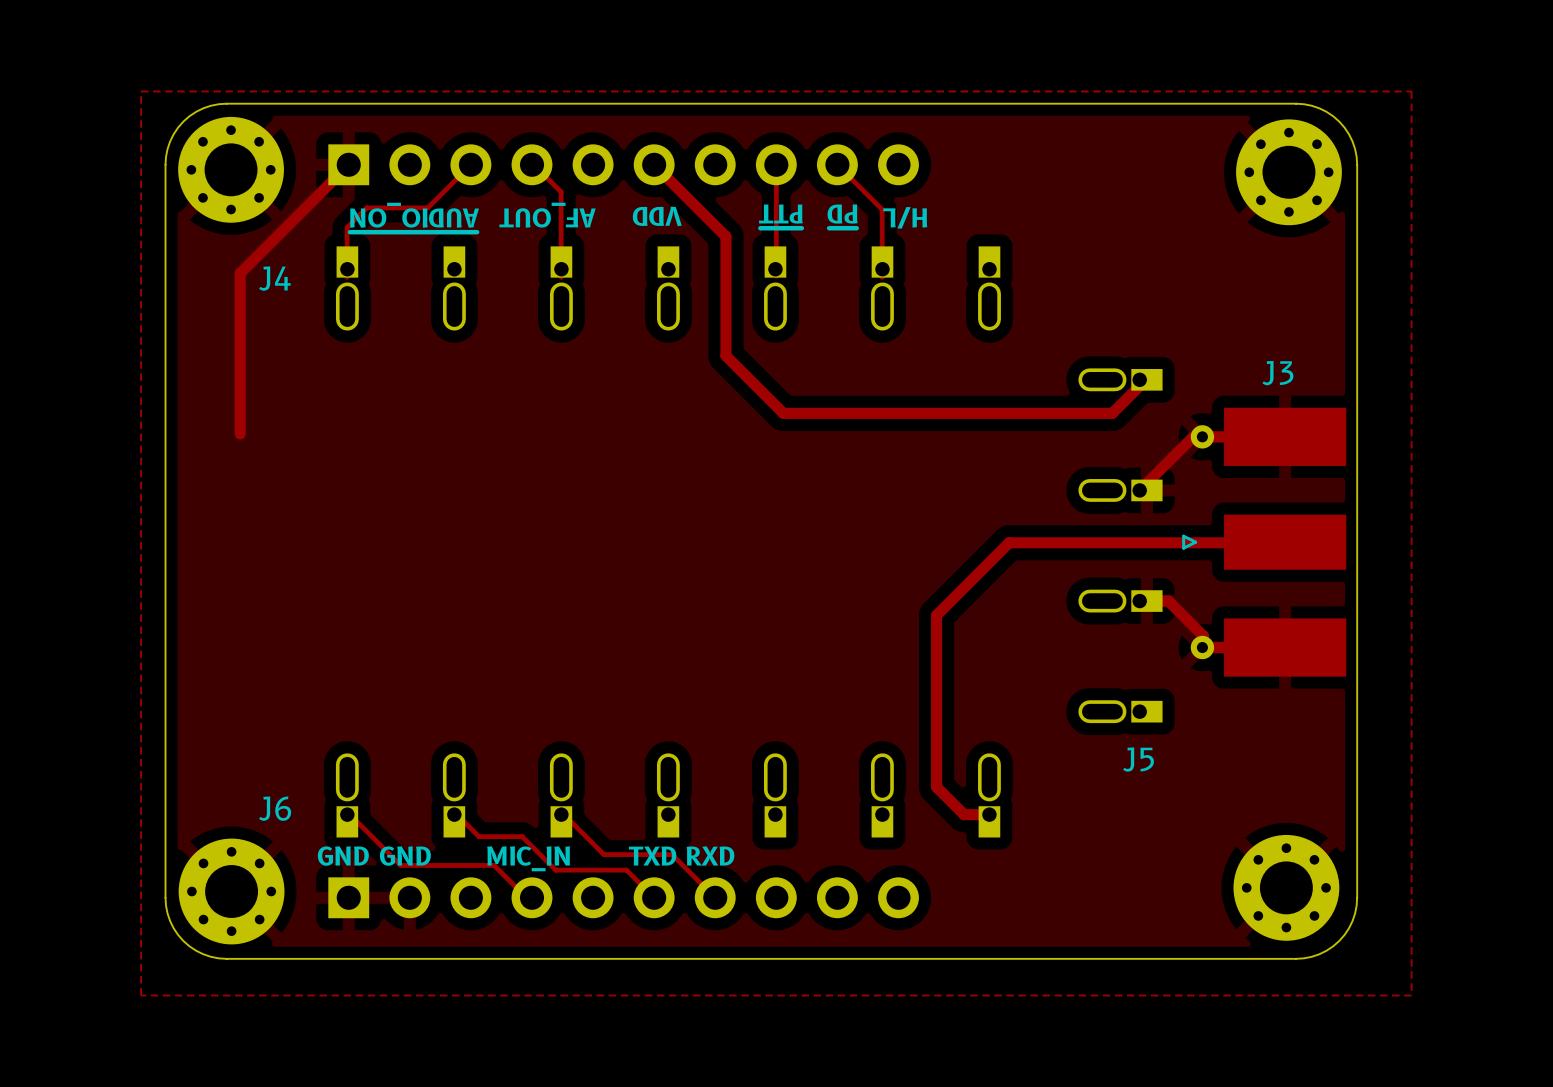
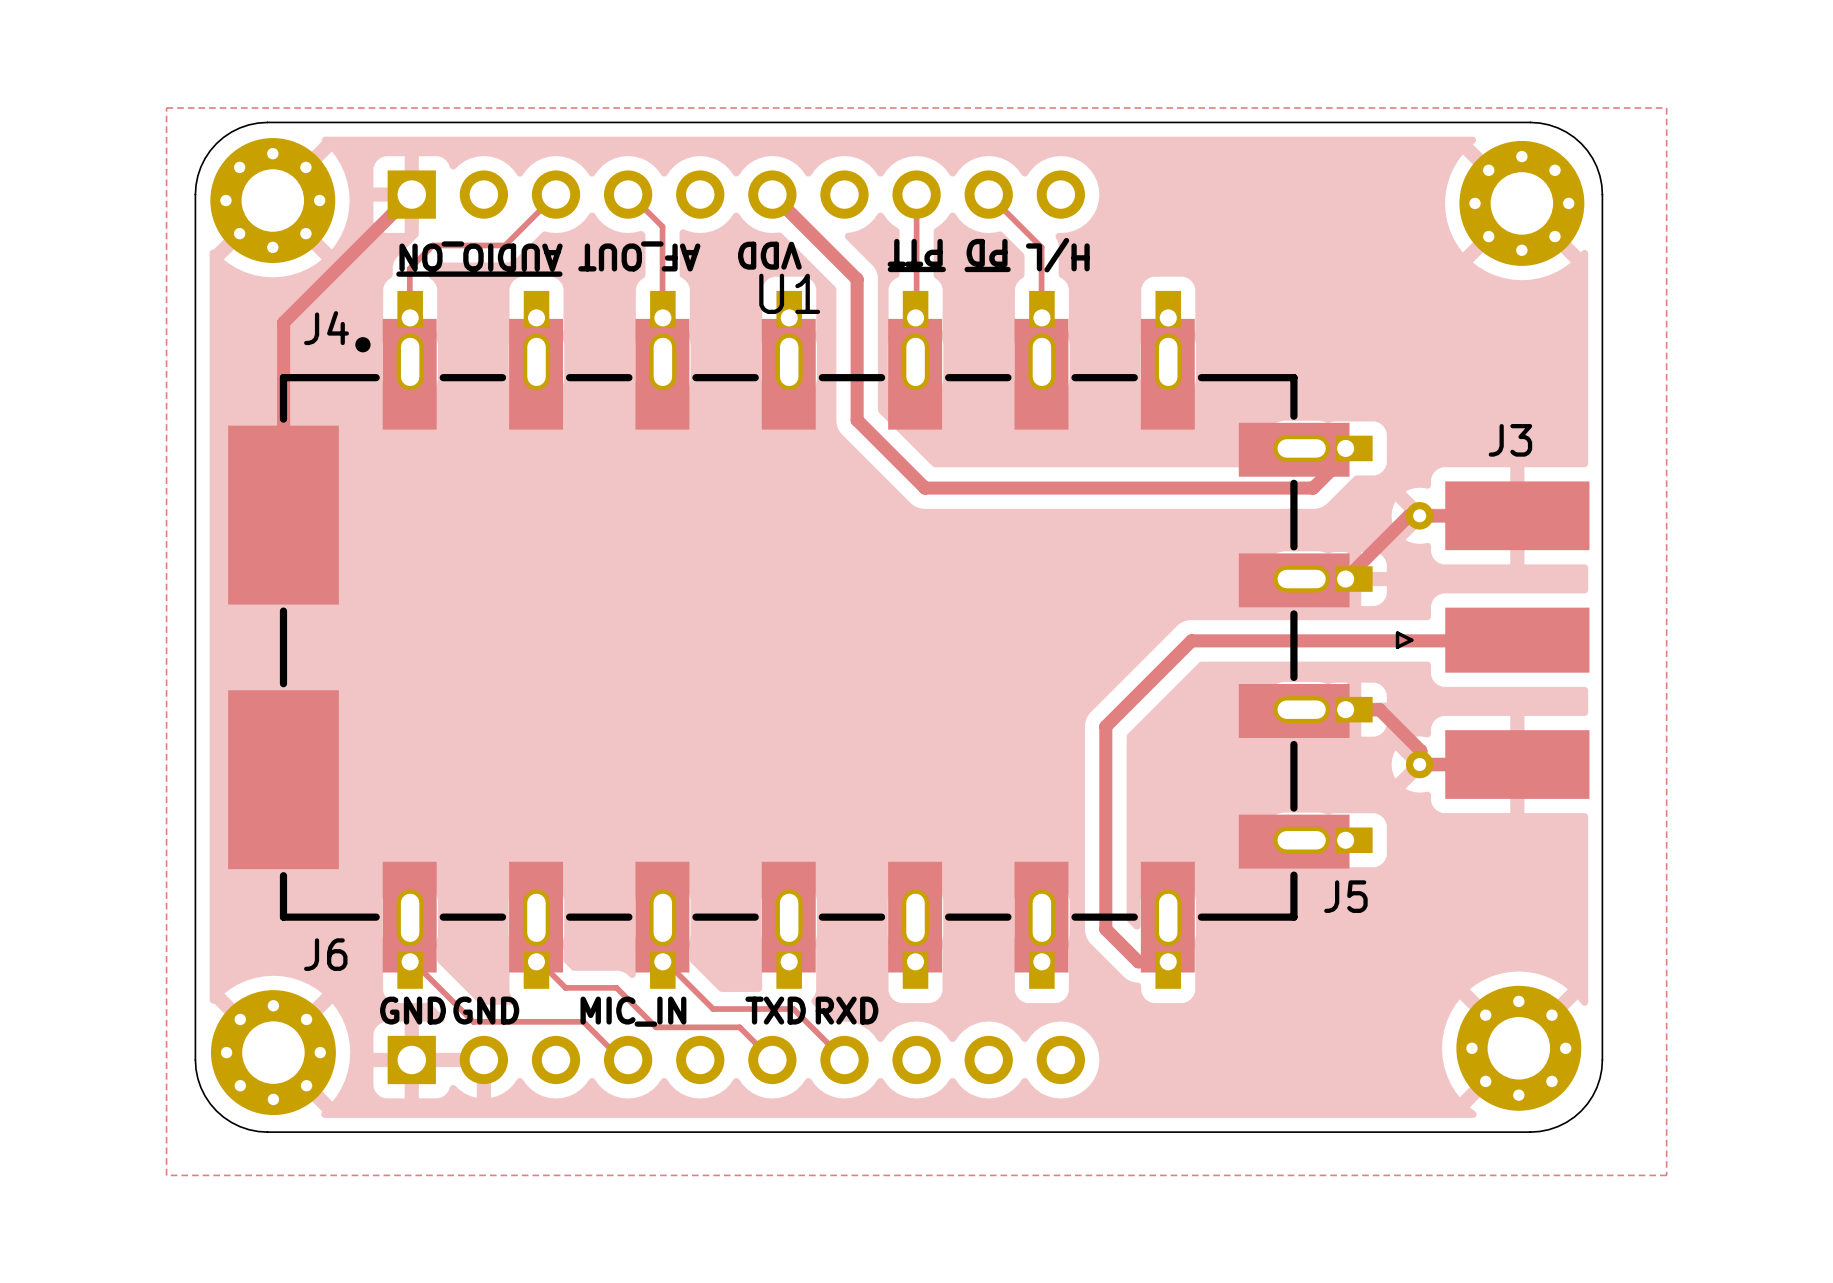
U1: none -> (788, 645)

